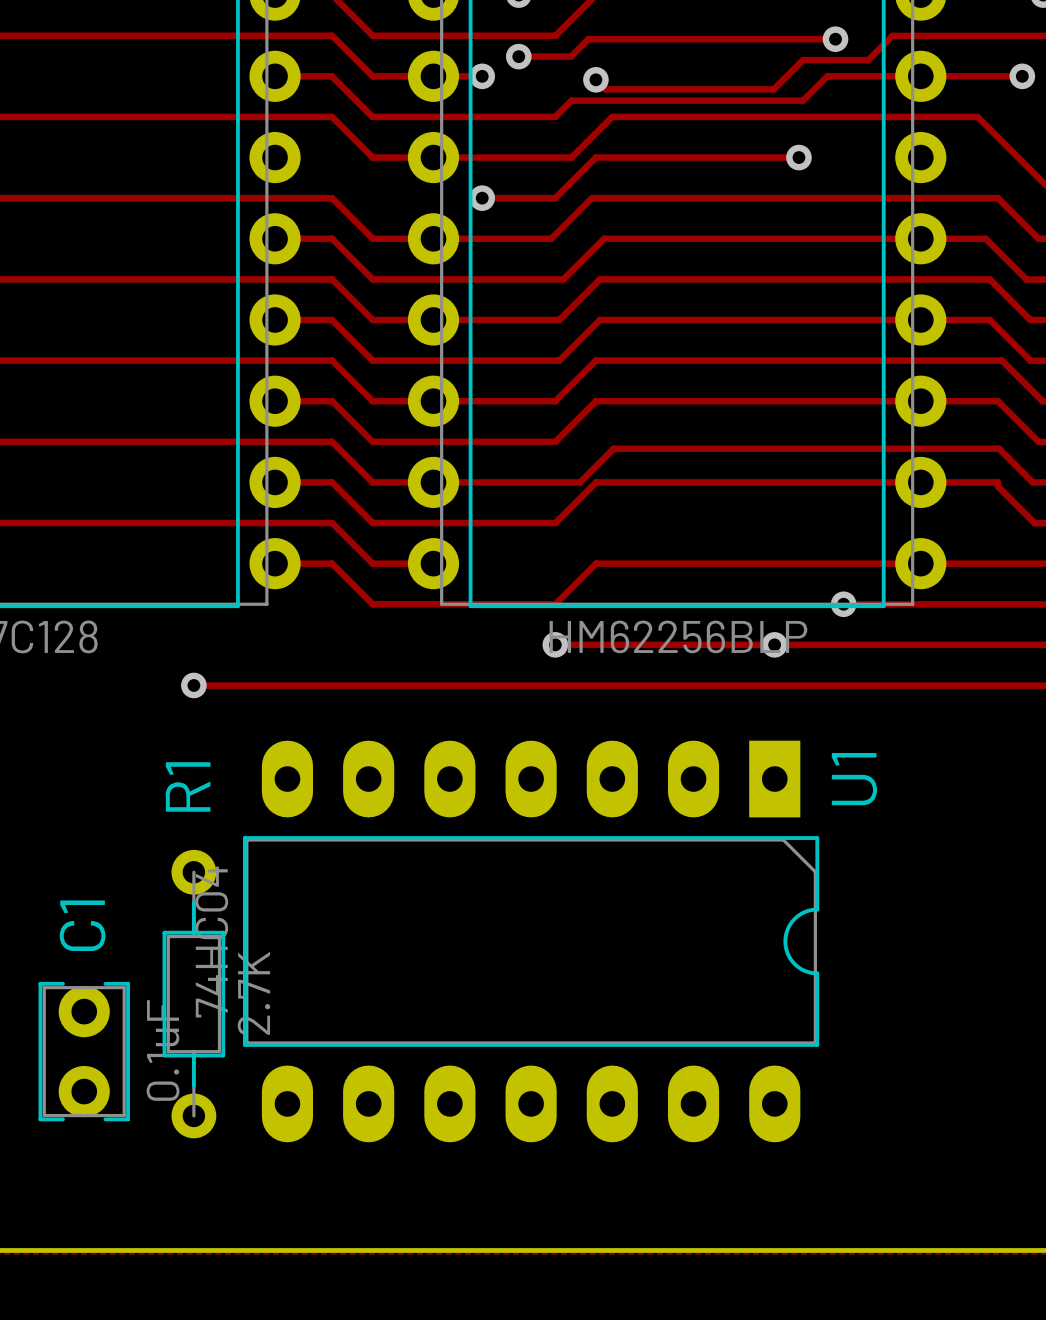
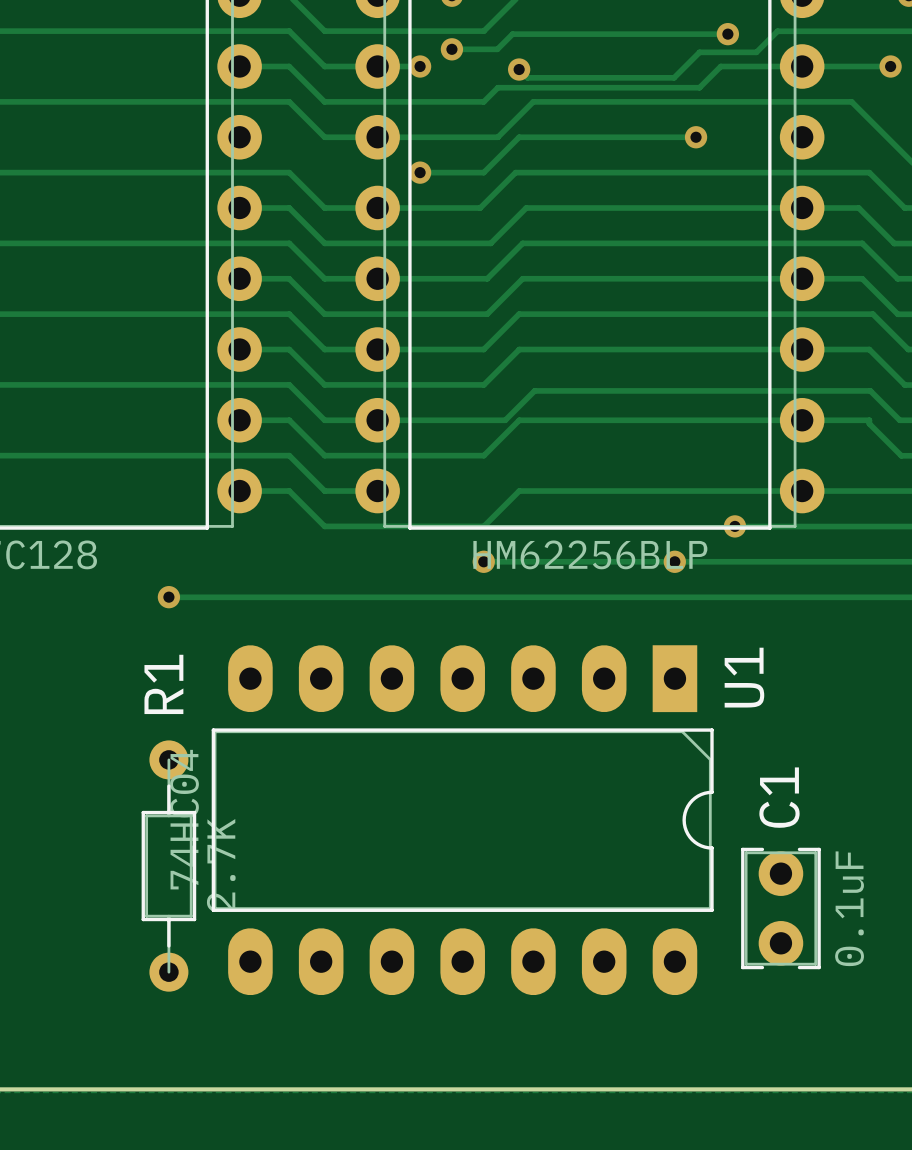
C1 position: (84, 1051) -> (780, 908)

